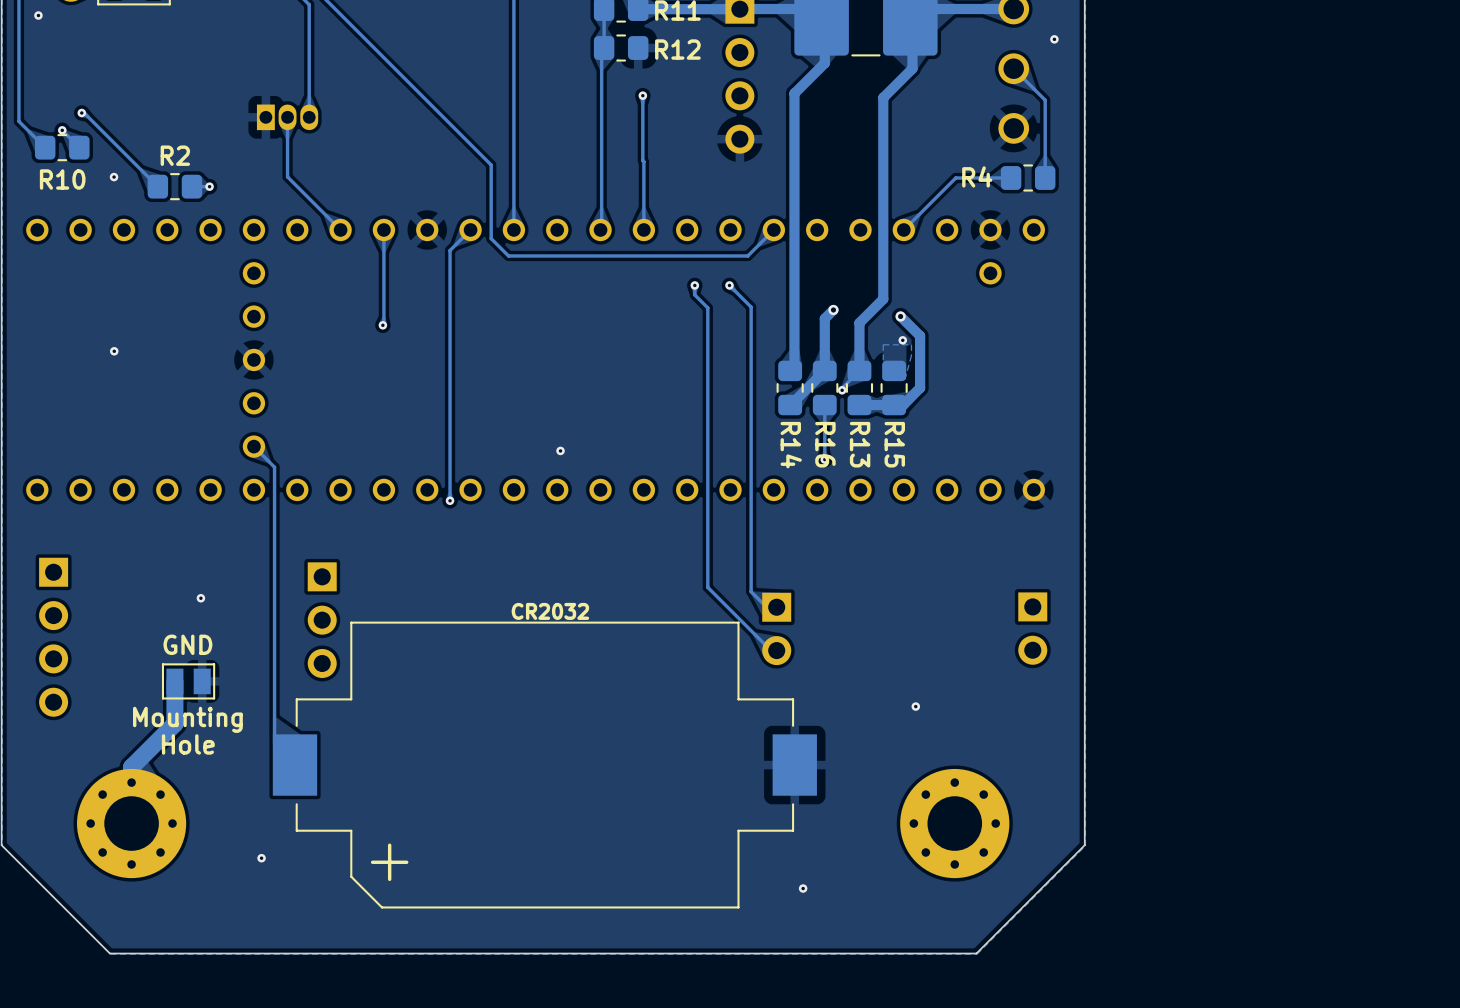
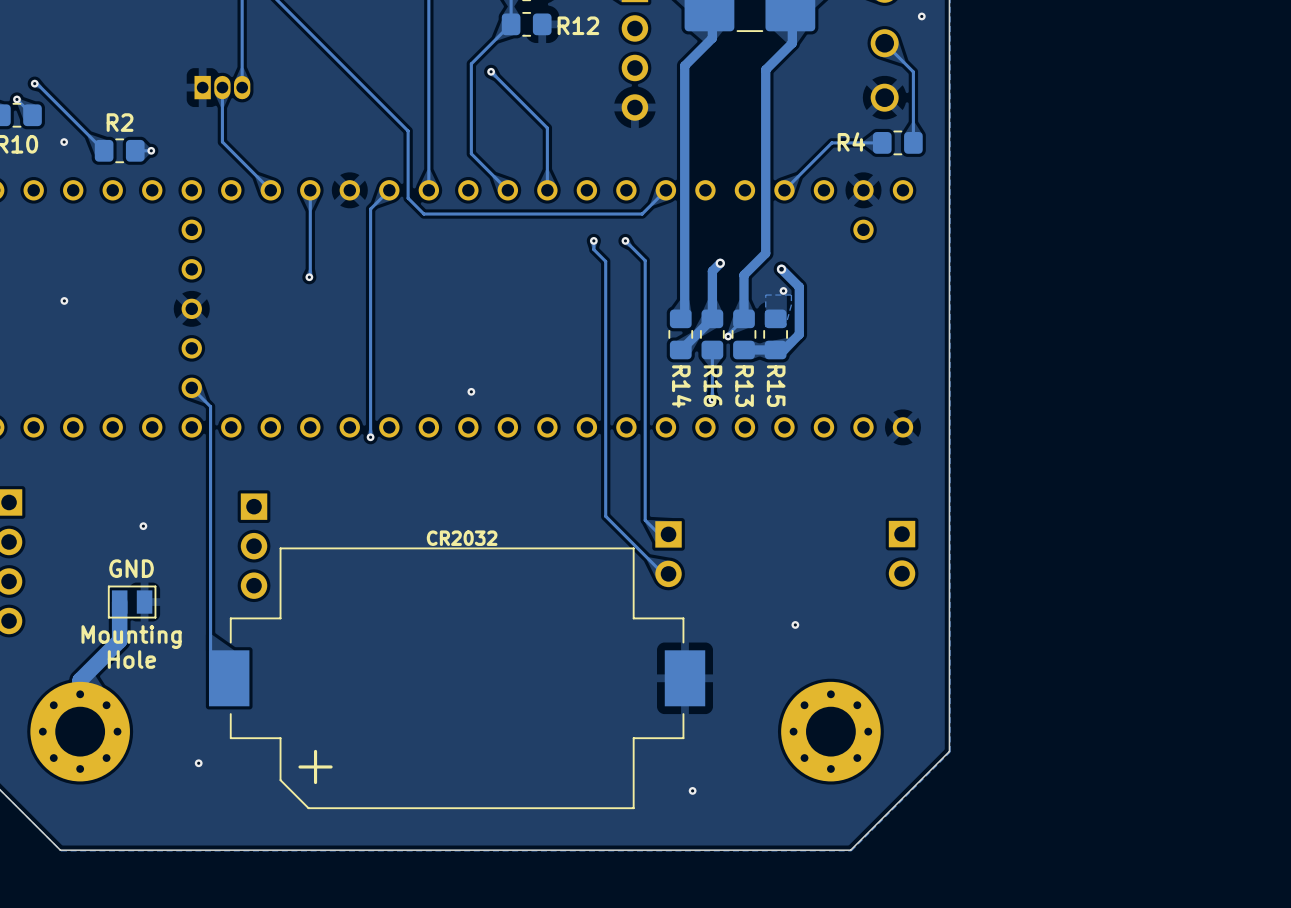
track: (601, 50) (600, 229) -> (508, 26) (471, 63) (471, 153) (507, 190)
track: (642, 95) (642, 160) -> (491, 71) (546, 127)
via position: (642, 95) -> (491, 71)

